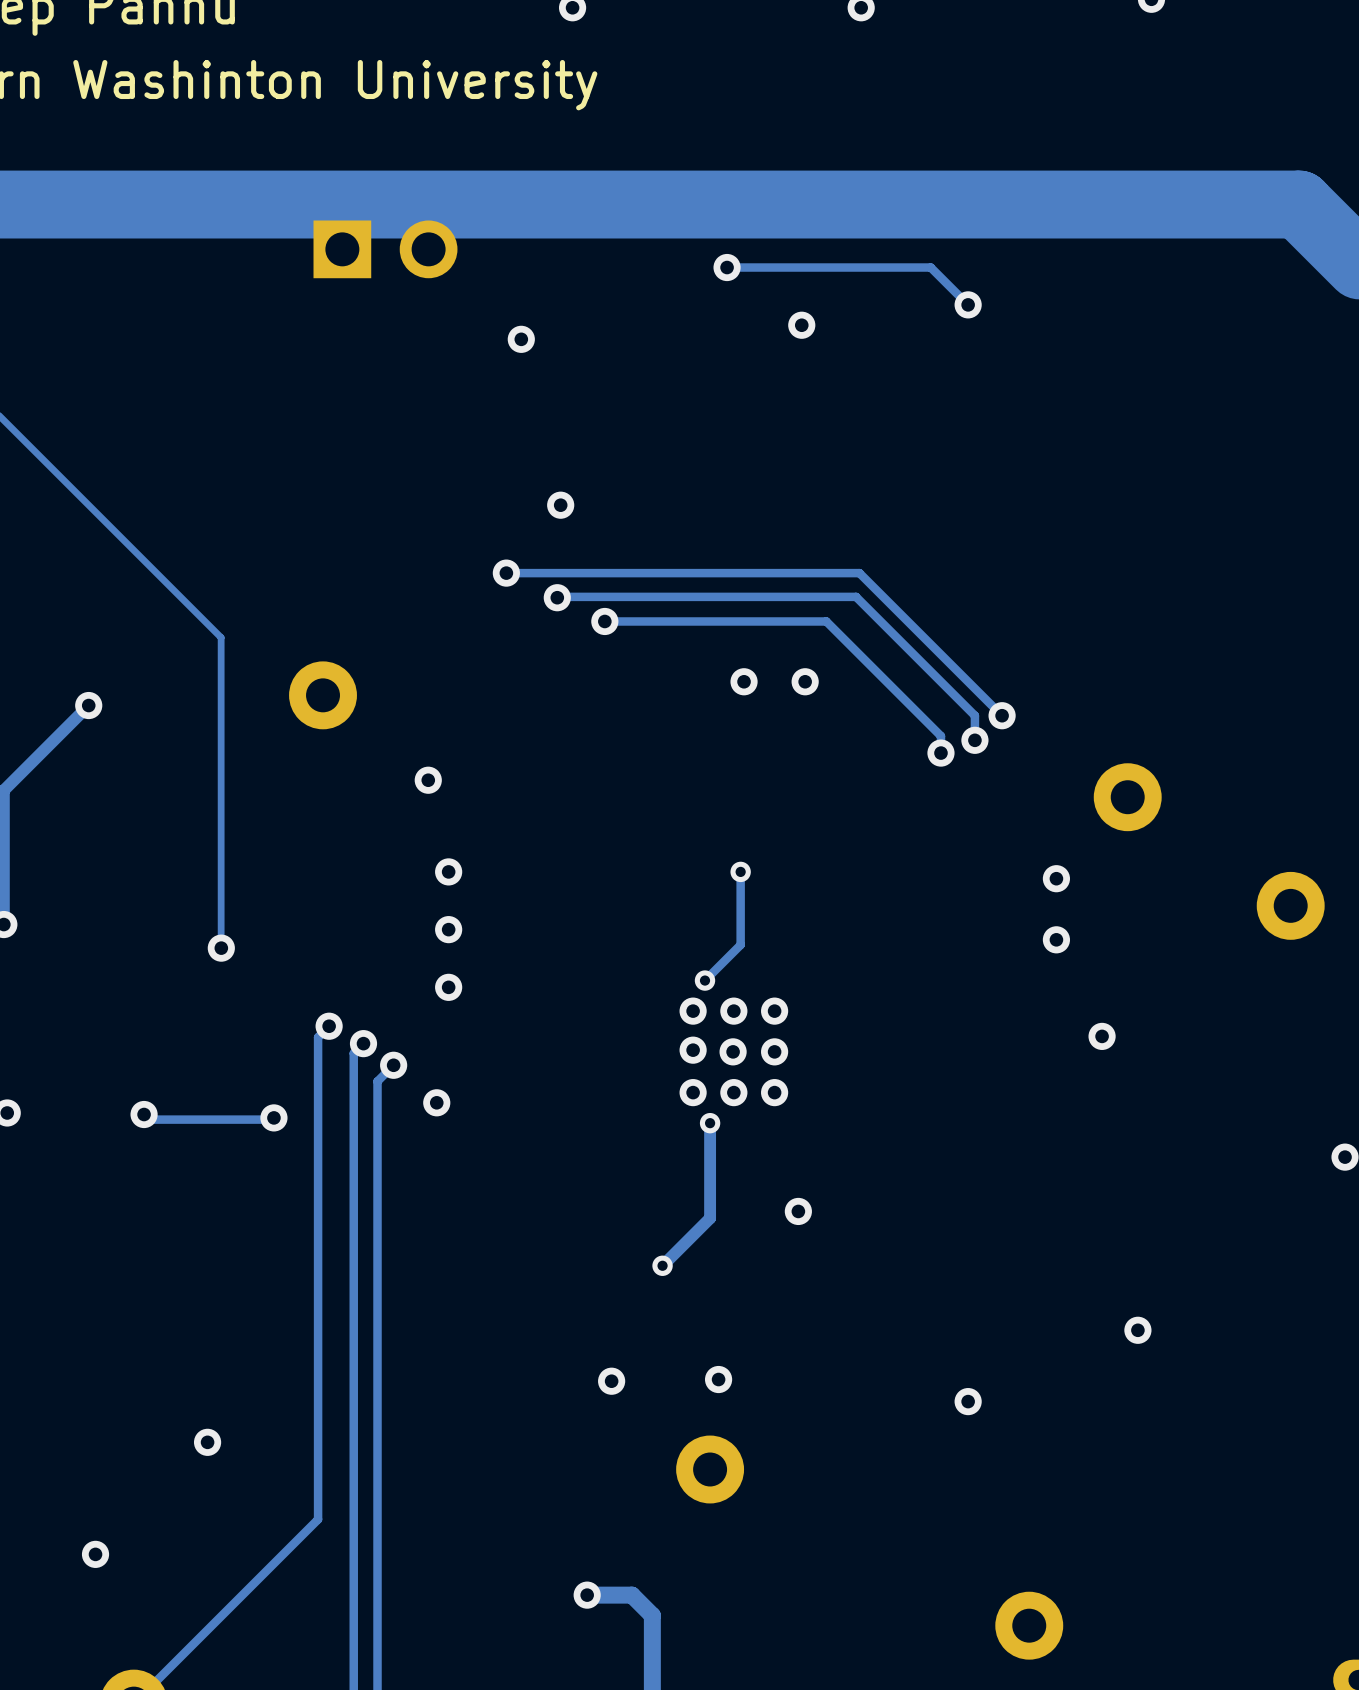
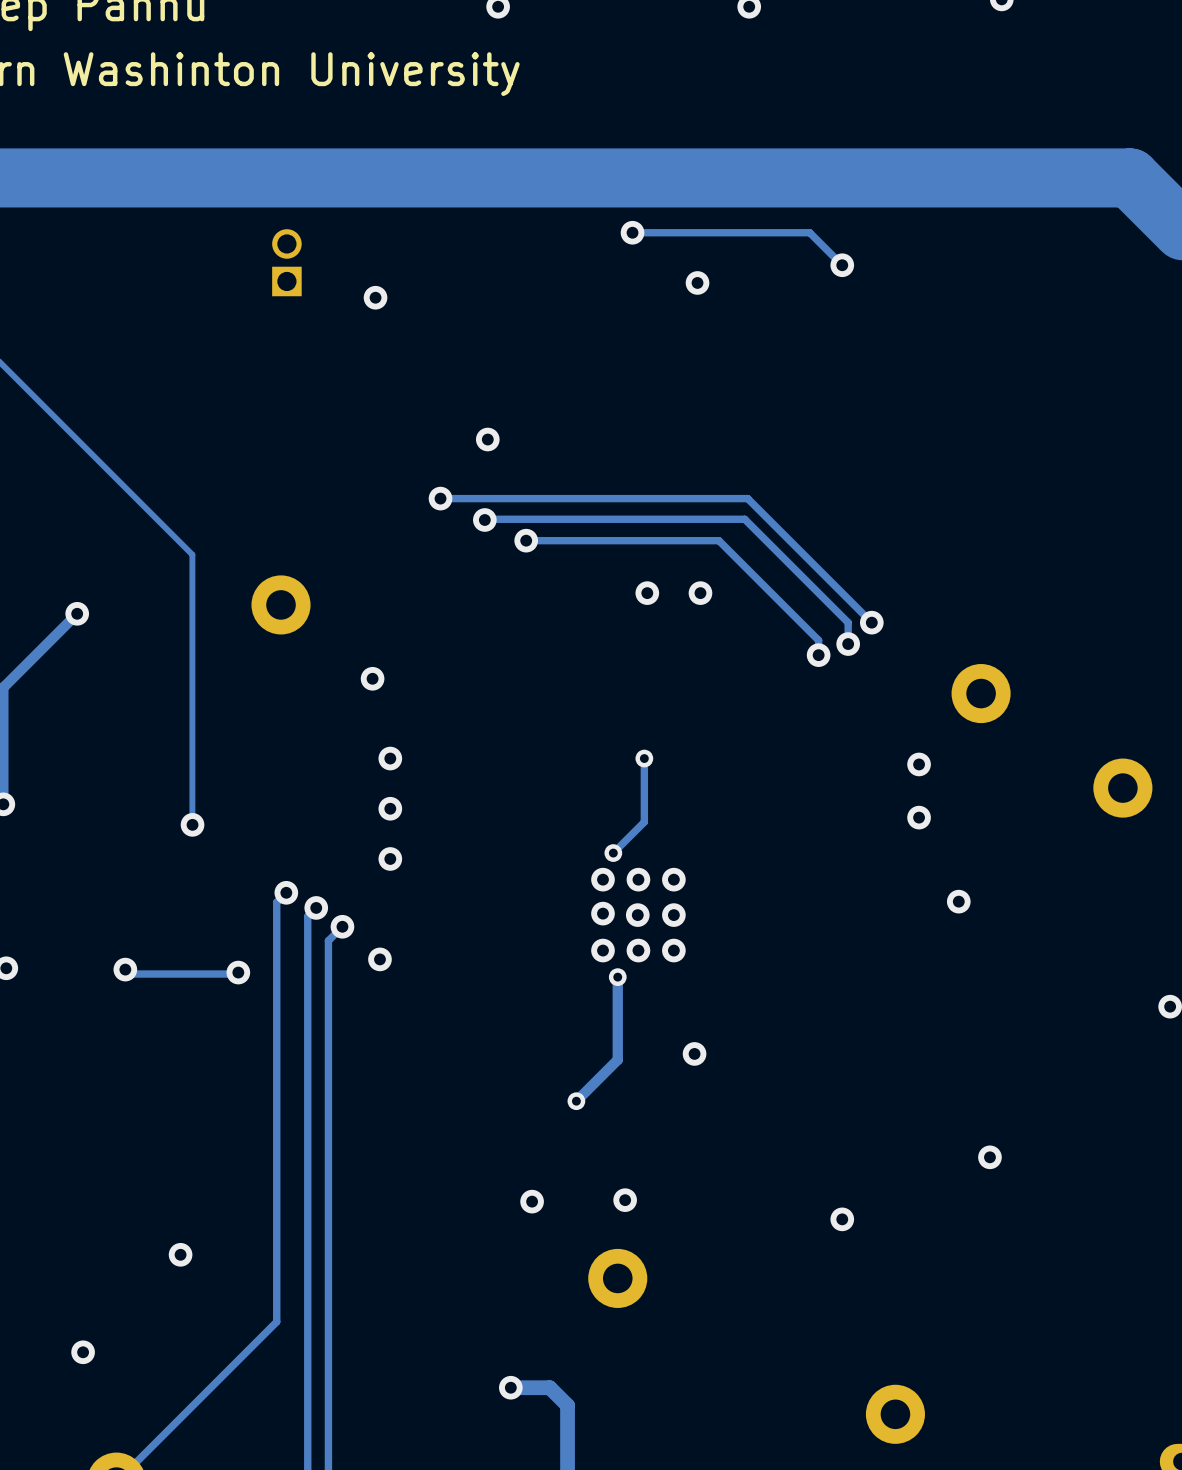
part: (385, 249) -> none
part: none -> (286, 262)
via position: (521, 339) -> (375, 297)

